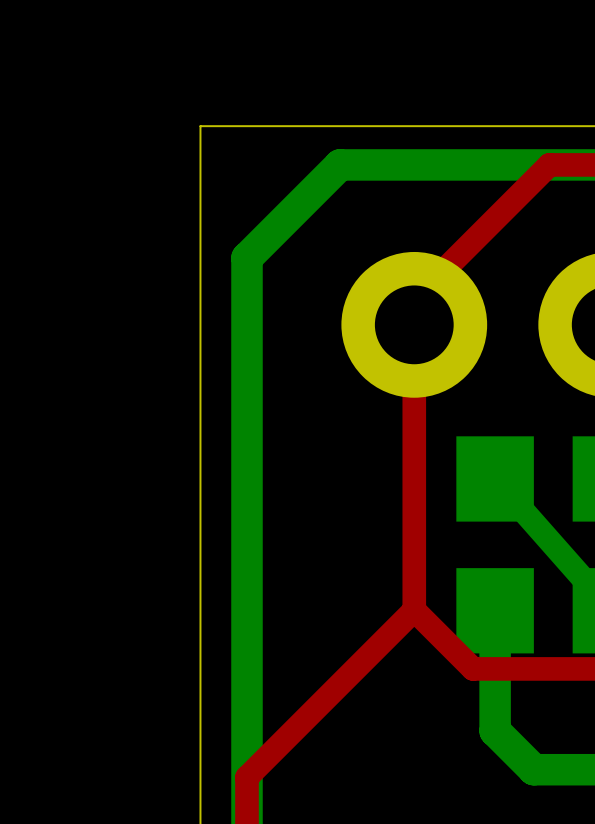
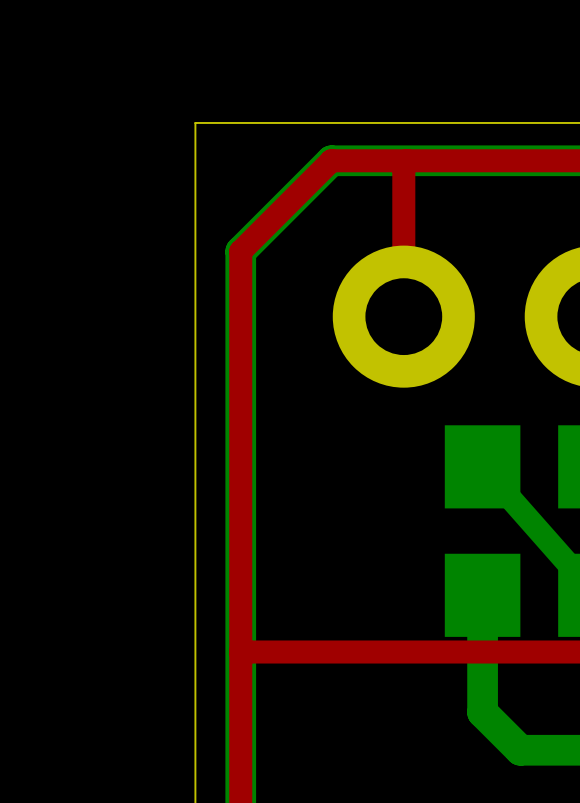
top track: (549, 164) (414, 300) -> (407, 160) (403, 163) (403, 292)
top track: (414, 324) (414, 610) -> none
top track: (414, 610) (473, 668) -> (240, 652) (461, 652)
top track: (414, 610) (246, 777) -> (535, 160) (331, 160) (240, 251) (240, 757)

